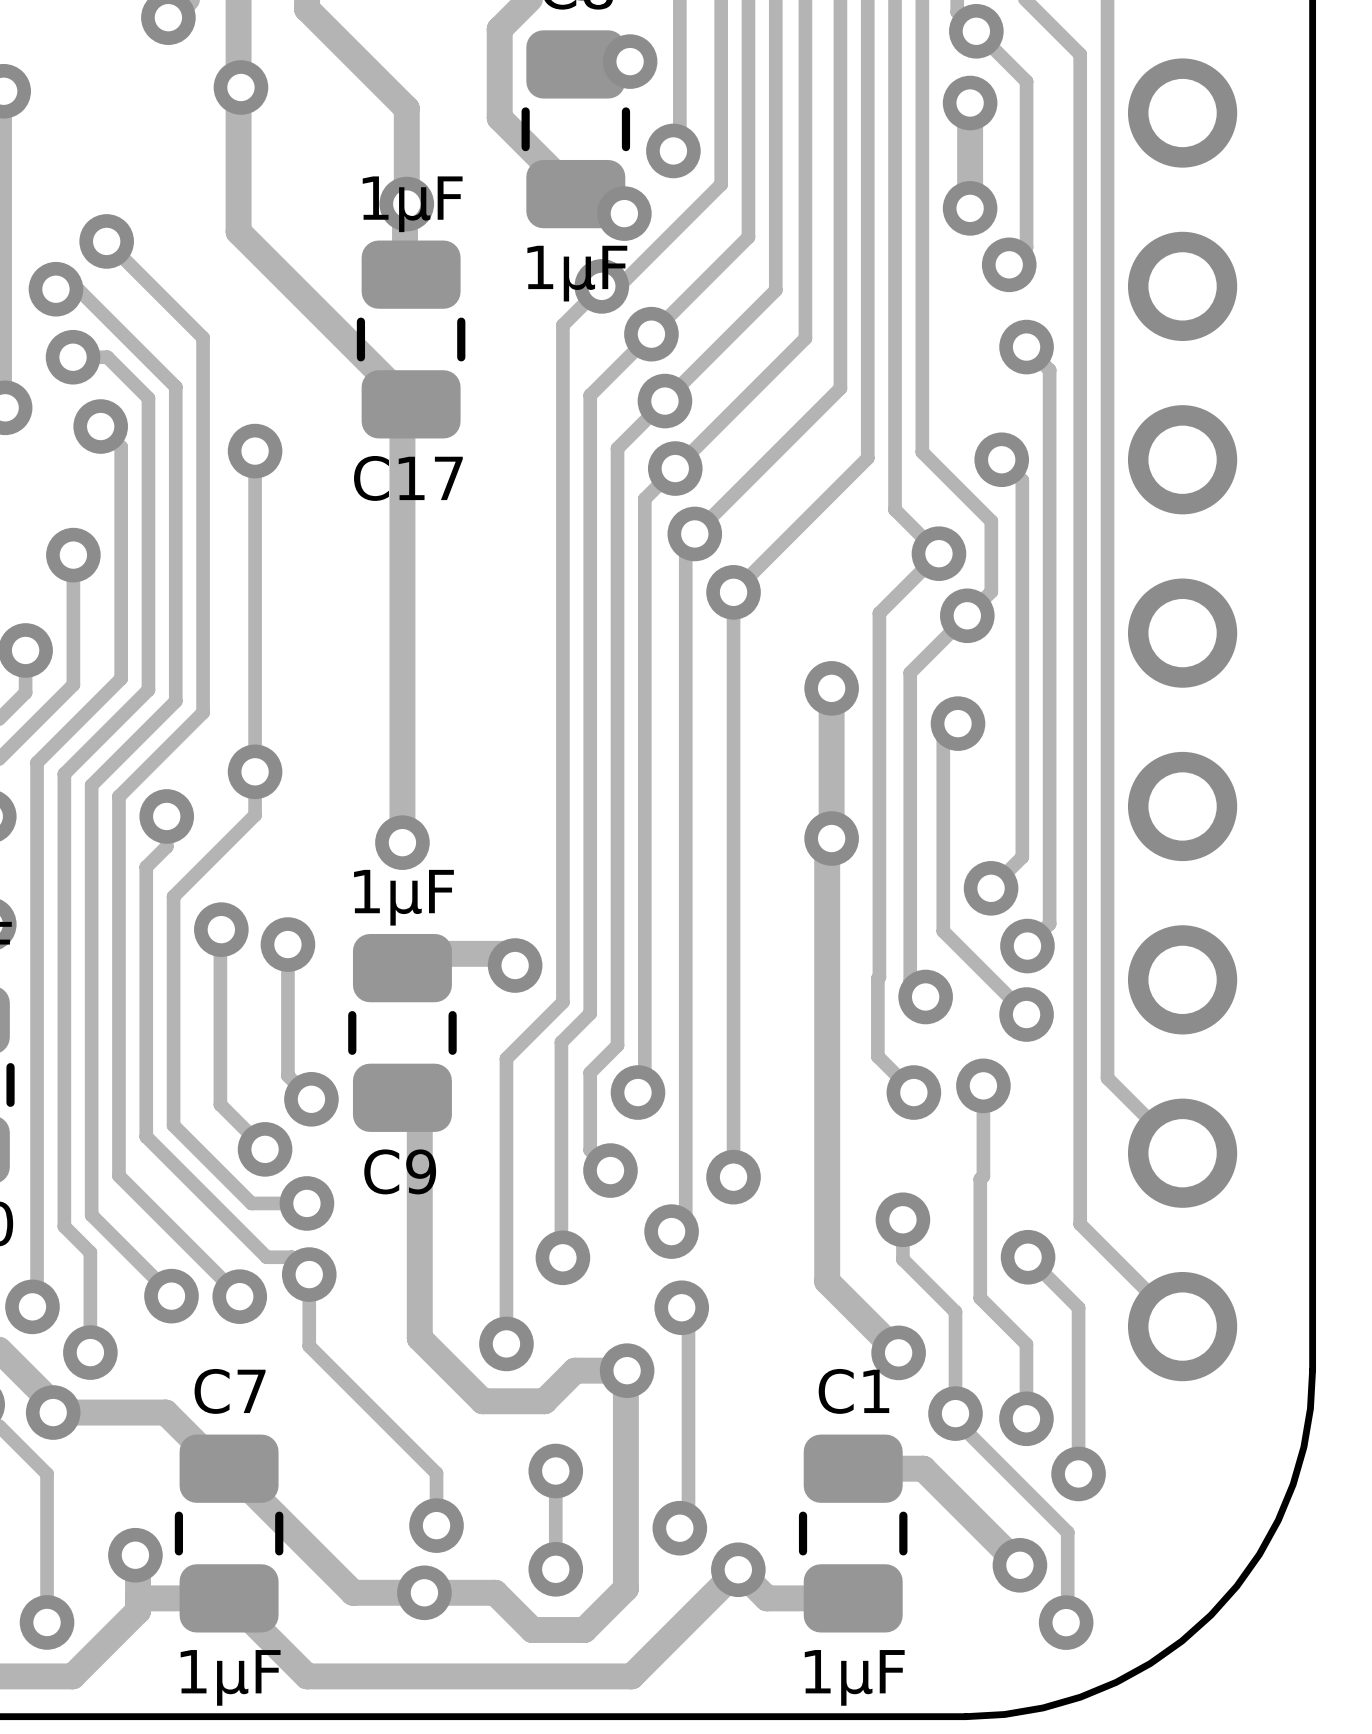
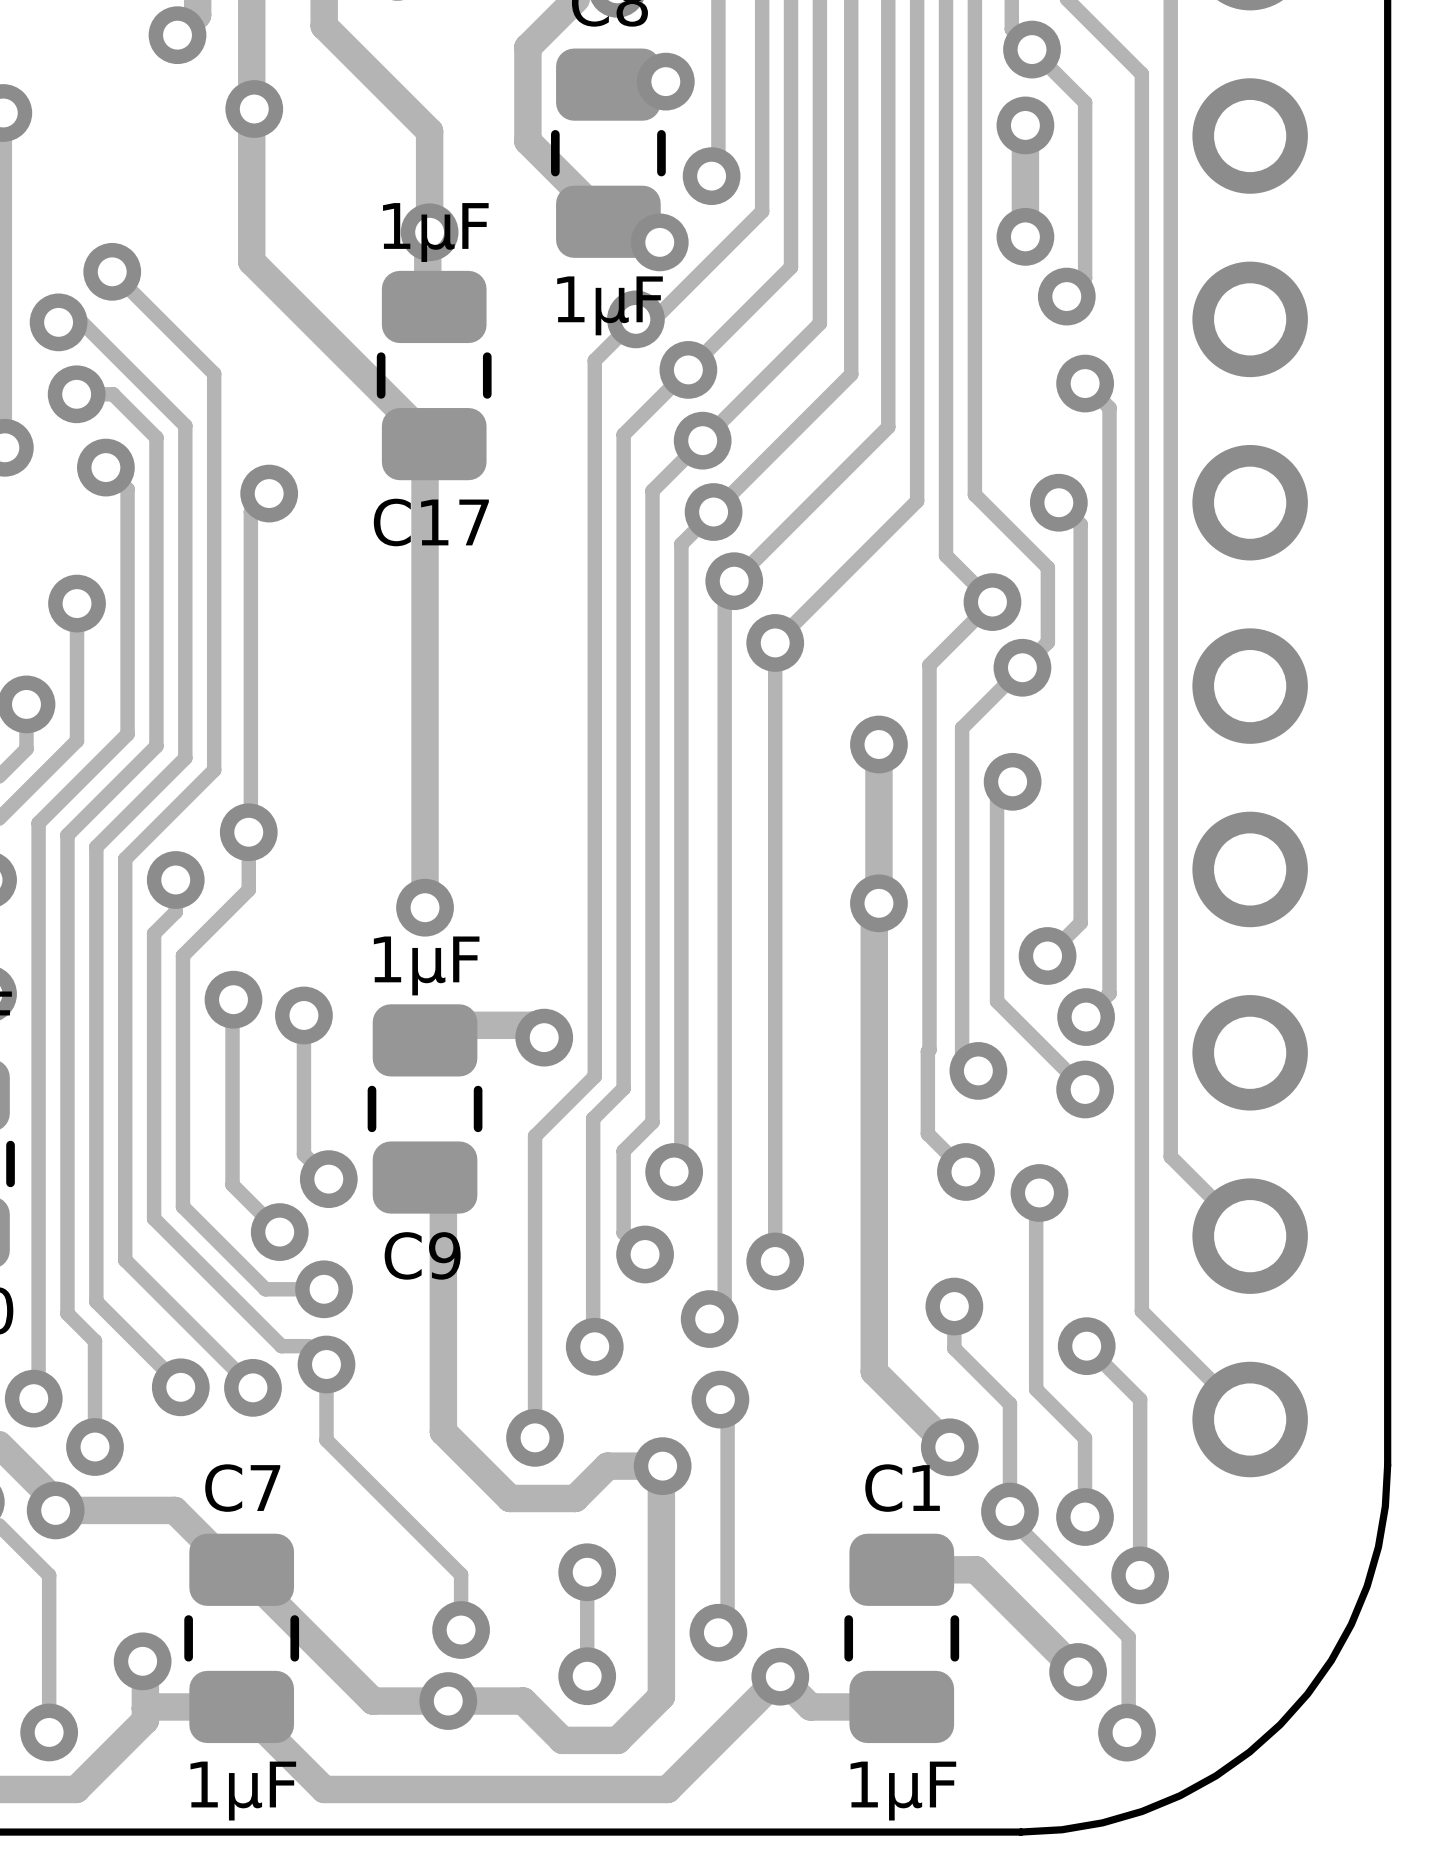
track: (255, 451) (255, 815) (173, 896) -> (269, 493) (250, 511) (250, 830) (248, 832) (248, 889) (182, 955) (182, 964)
via position: (255, 771) -> (248, 832)
track: (983, 1085) (983, 1176) (980, 1179) -> (1039, 1192) (1036, 1196) (1036, 1263)
via position: (983, 1085) -> (1039, 1192)

